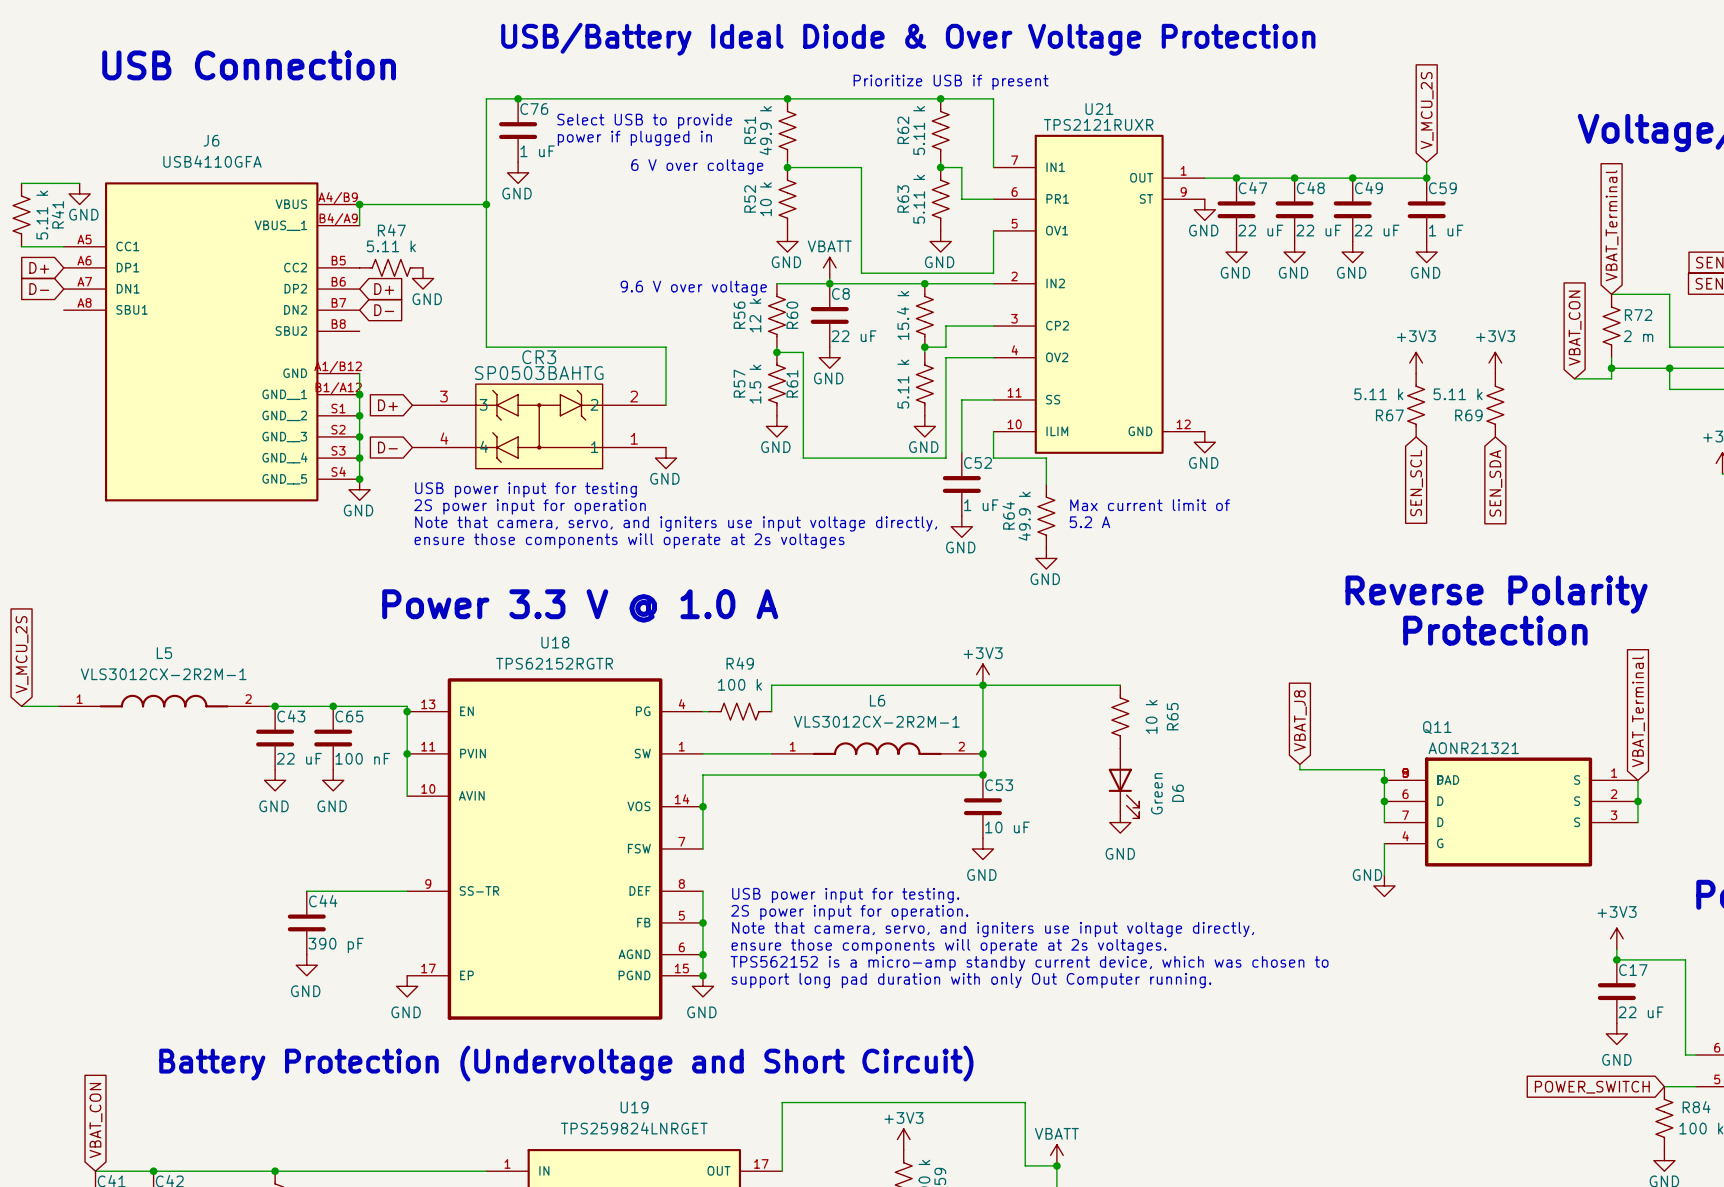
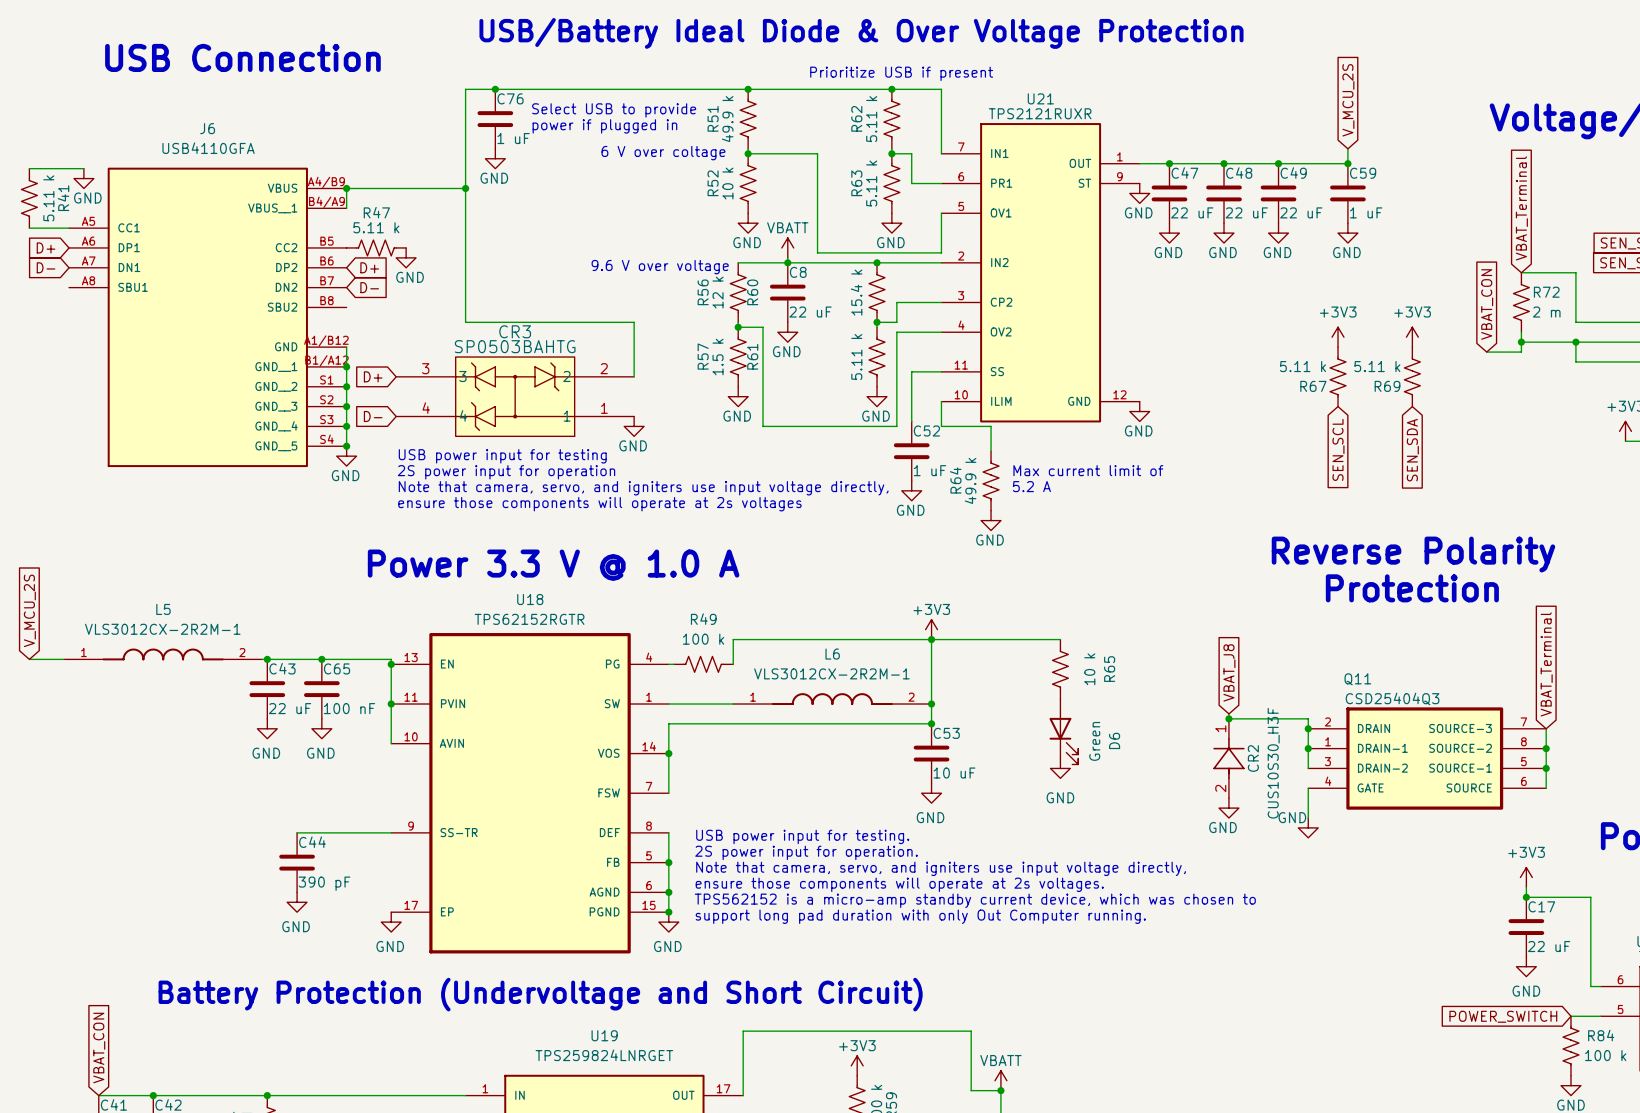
Q11 value: AONR21321 (1473, 748) -> CSD25404Q3 (1392, 698)
Q11 symbol: [1384, 757, 1638, 867] -> [1308, 707, 1547, 810]
junction: none -> (1228, 718)
CR2: none -> CUS10S30_H3F (1228, 758)
wire: none -> (1546, 768) (1546, 788)
junction: none -> (1546, 768)
power symbol: none -> GND (1228, 808)

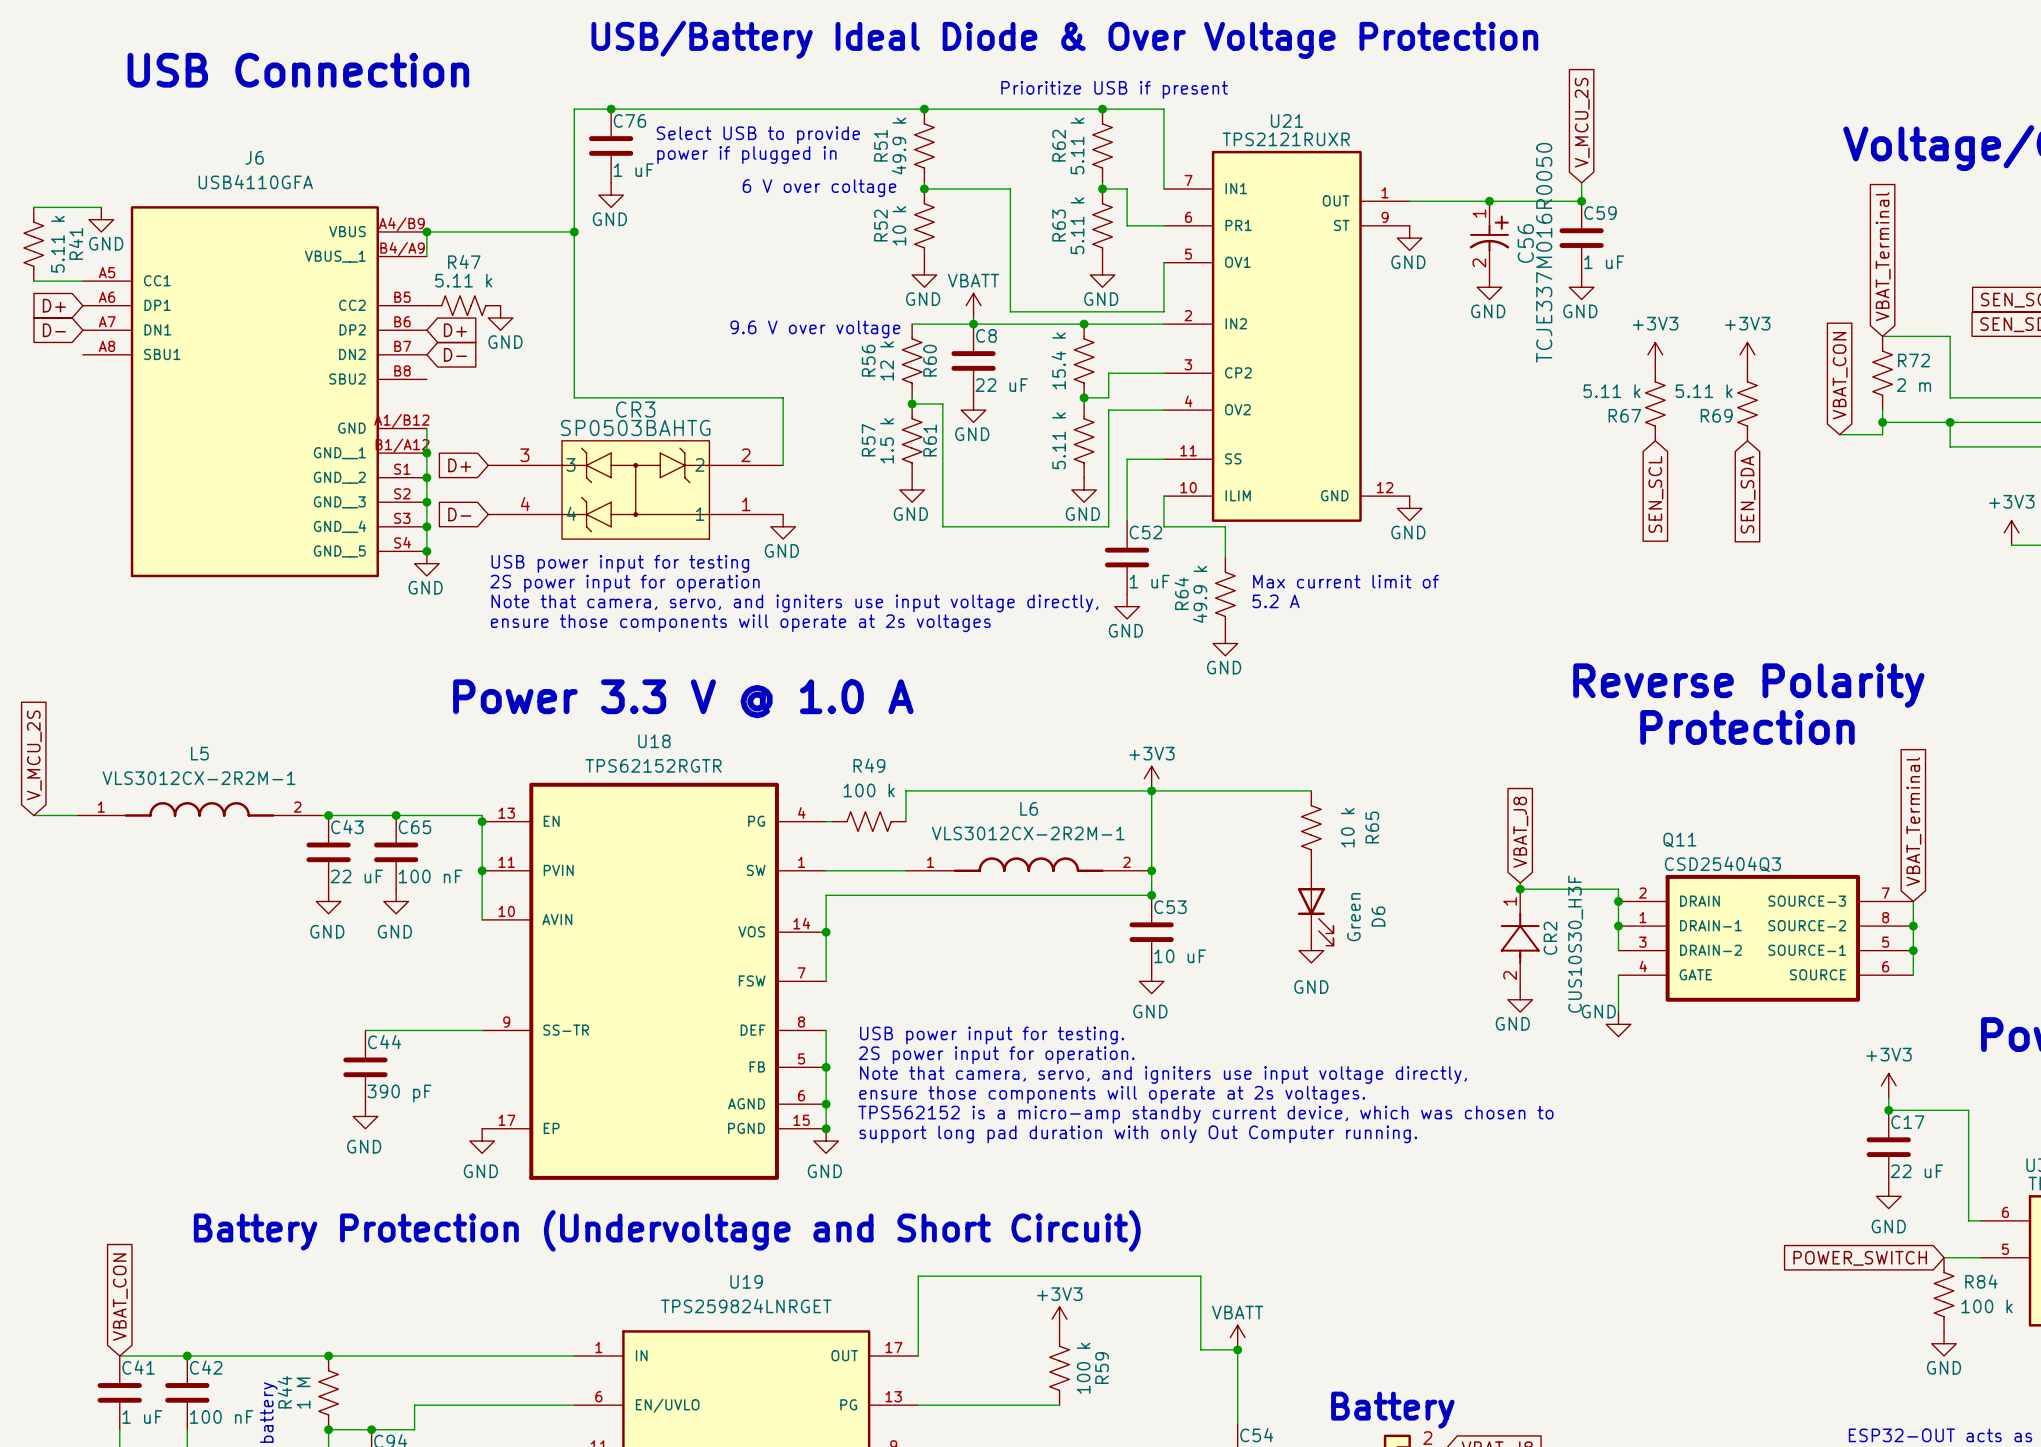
global label position: V_MCU_2S (1348, 100) -> V_MCU_2S (1582, 122)
wire: (1347, 148) (1347, 163) (1278, 163) -> (1581, 182) (1581, 201)
junction: (1169, 163) -> none
junction: none -> (1489, 201)
junction: (1224, 163) -> none
junction: (1347, 163) -> none
C49 name: C49 (1293, 173) -> C59 (1600, 213)
C47: 22 uF (1169, 193) -> none
C56: none -> TCJE337M016R0050 (1489, 238)
C48: 22 uF (1224, 193) -> none
C59: 1 uF (1347, 193) -> none
C49 value: 22 uF (1301, 212) -> 1 uF (1604, 262)
power symbol: GND (1169, 233) -> none
power symbol: none -> GND (1489, 287)
power symbol: GND (1224, 233) -> none
power symbol: GND (1347, 233) -> none
power symbol: none -> +3V3 (1655, 354)
power symbol: none -> +3V3 (1747, 354)
power symbol: +3V3 (1338, 337) -> none
power symbol: +3V3 (1412, 337) -> none
R67 position: (1338, 376) -> (1655, 403)
R69 position: (1412, 376) -> (1747, 403)
global label position: SEN_SCL (1338, 449) -> SEN_SCL (1655, 494)
global label position: SEN_SDA (1412, 450) -> SEN_SDA (1748, 494)

